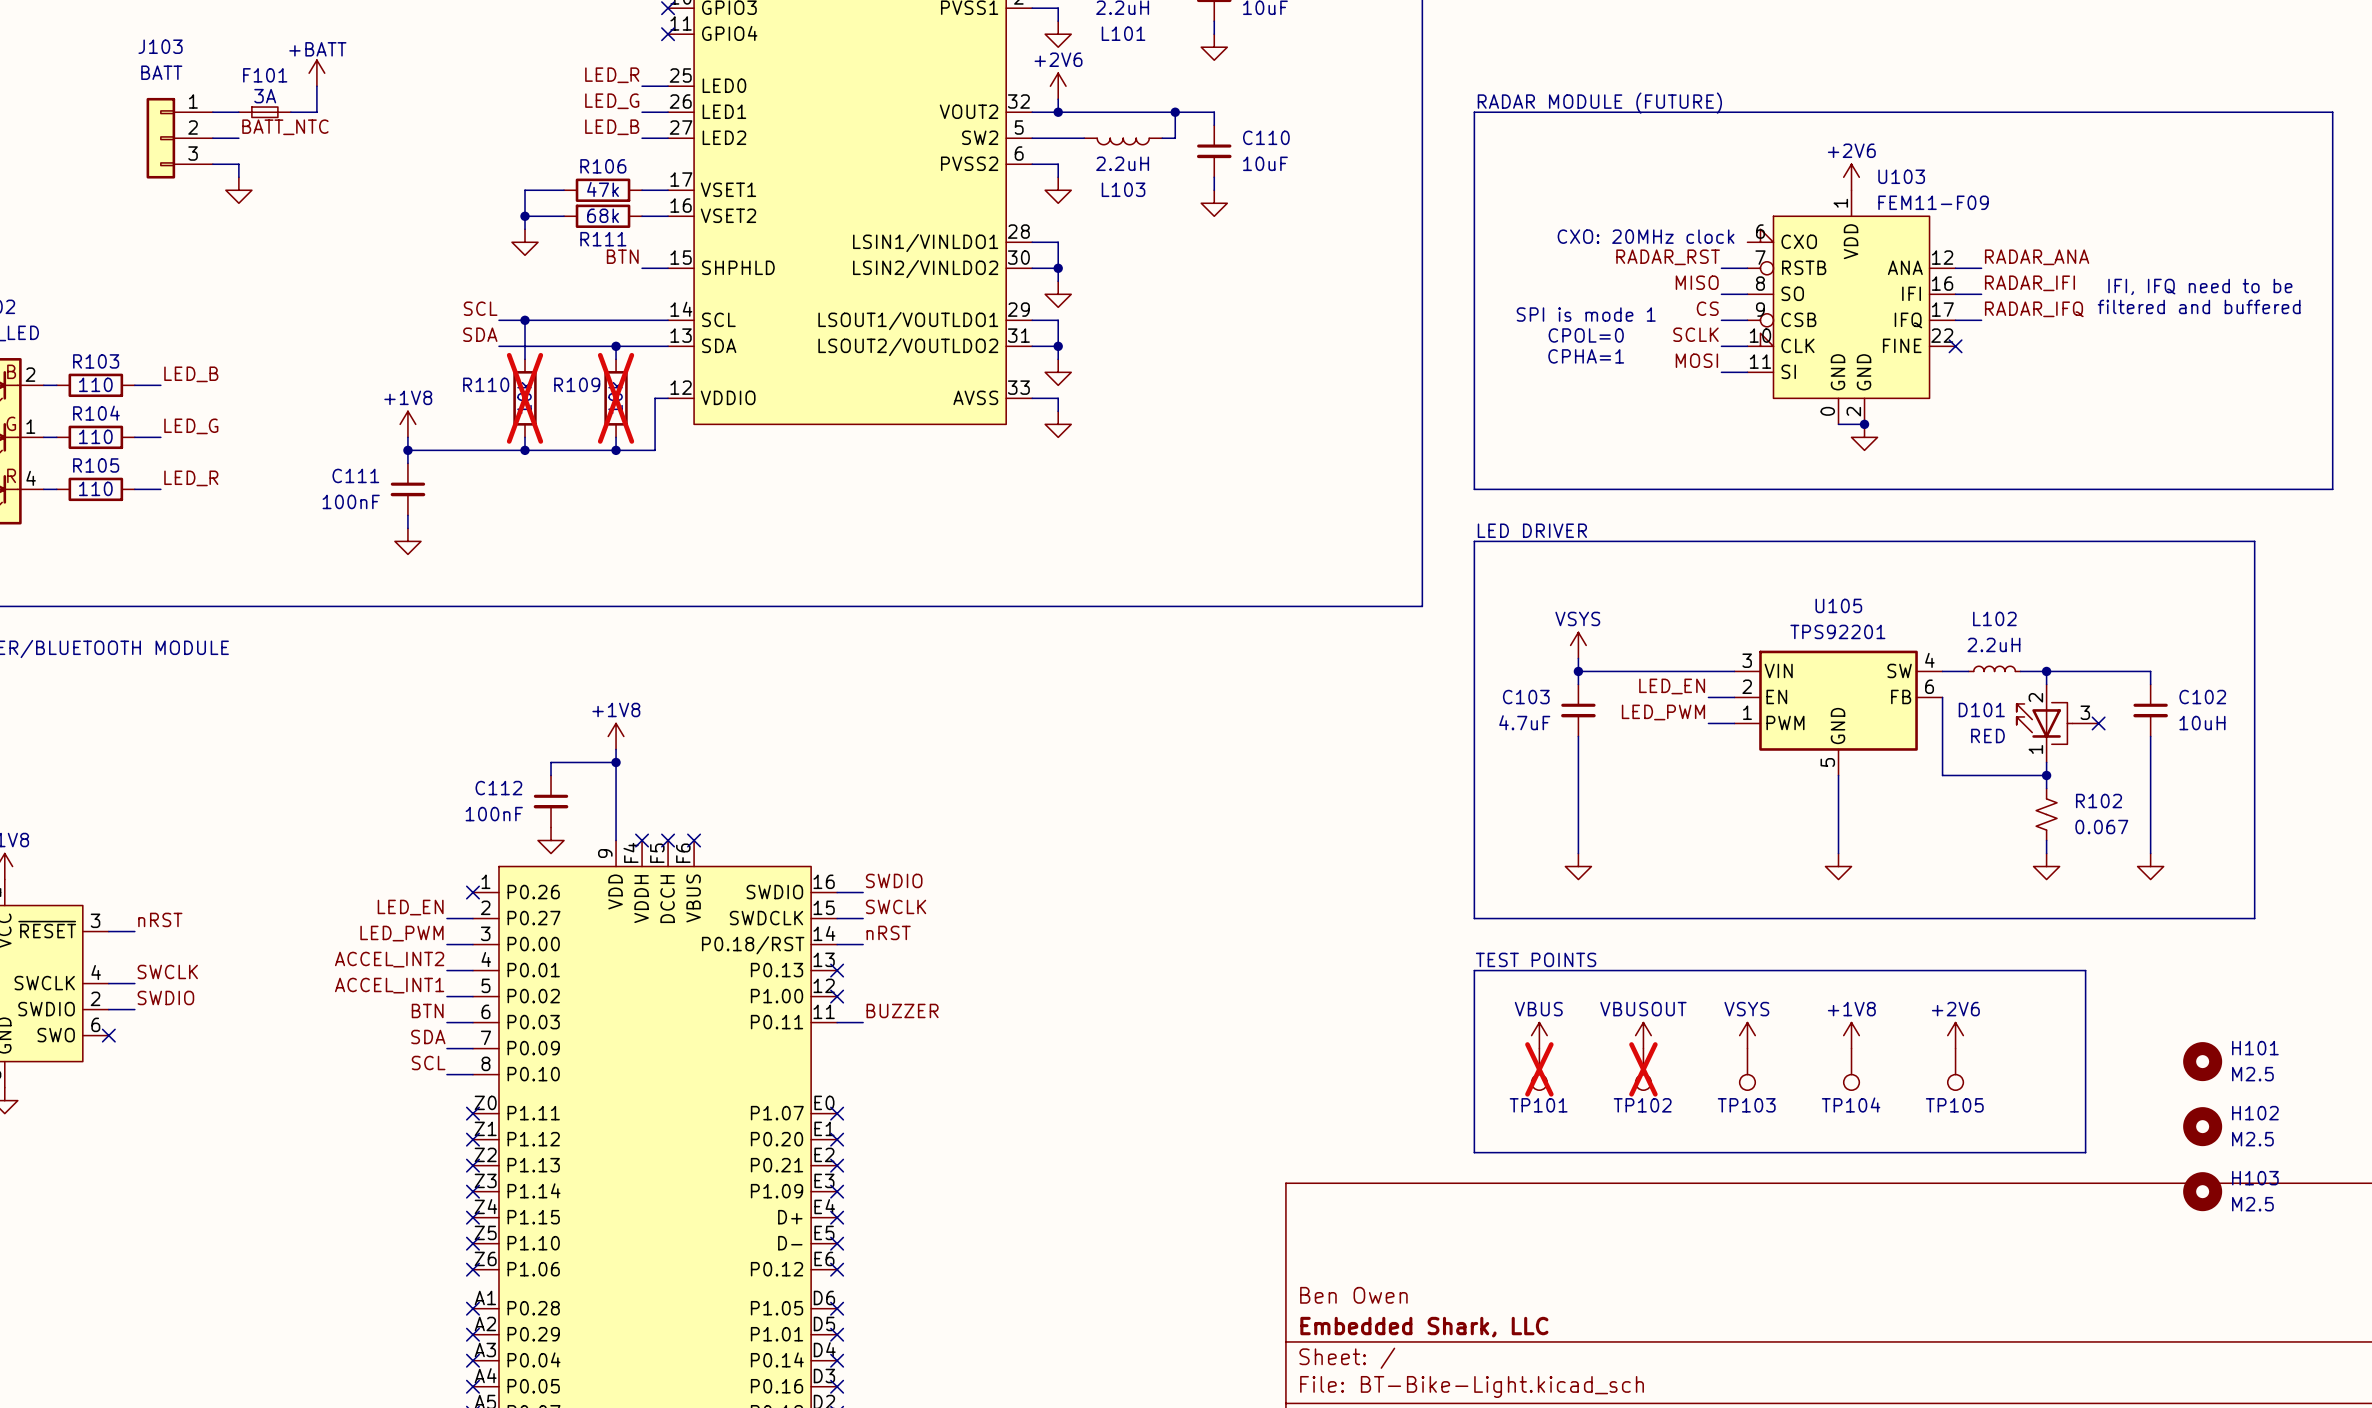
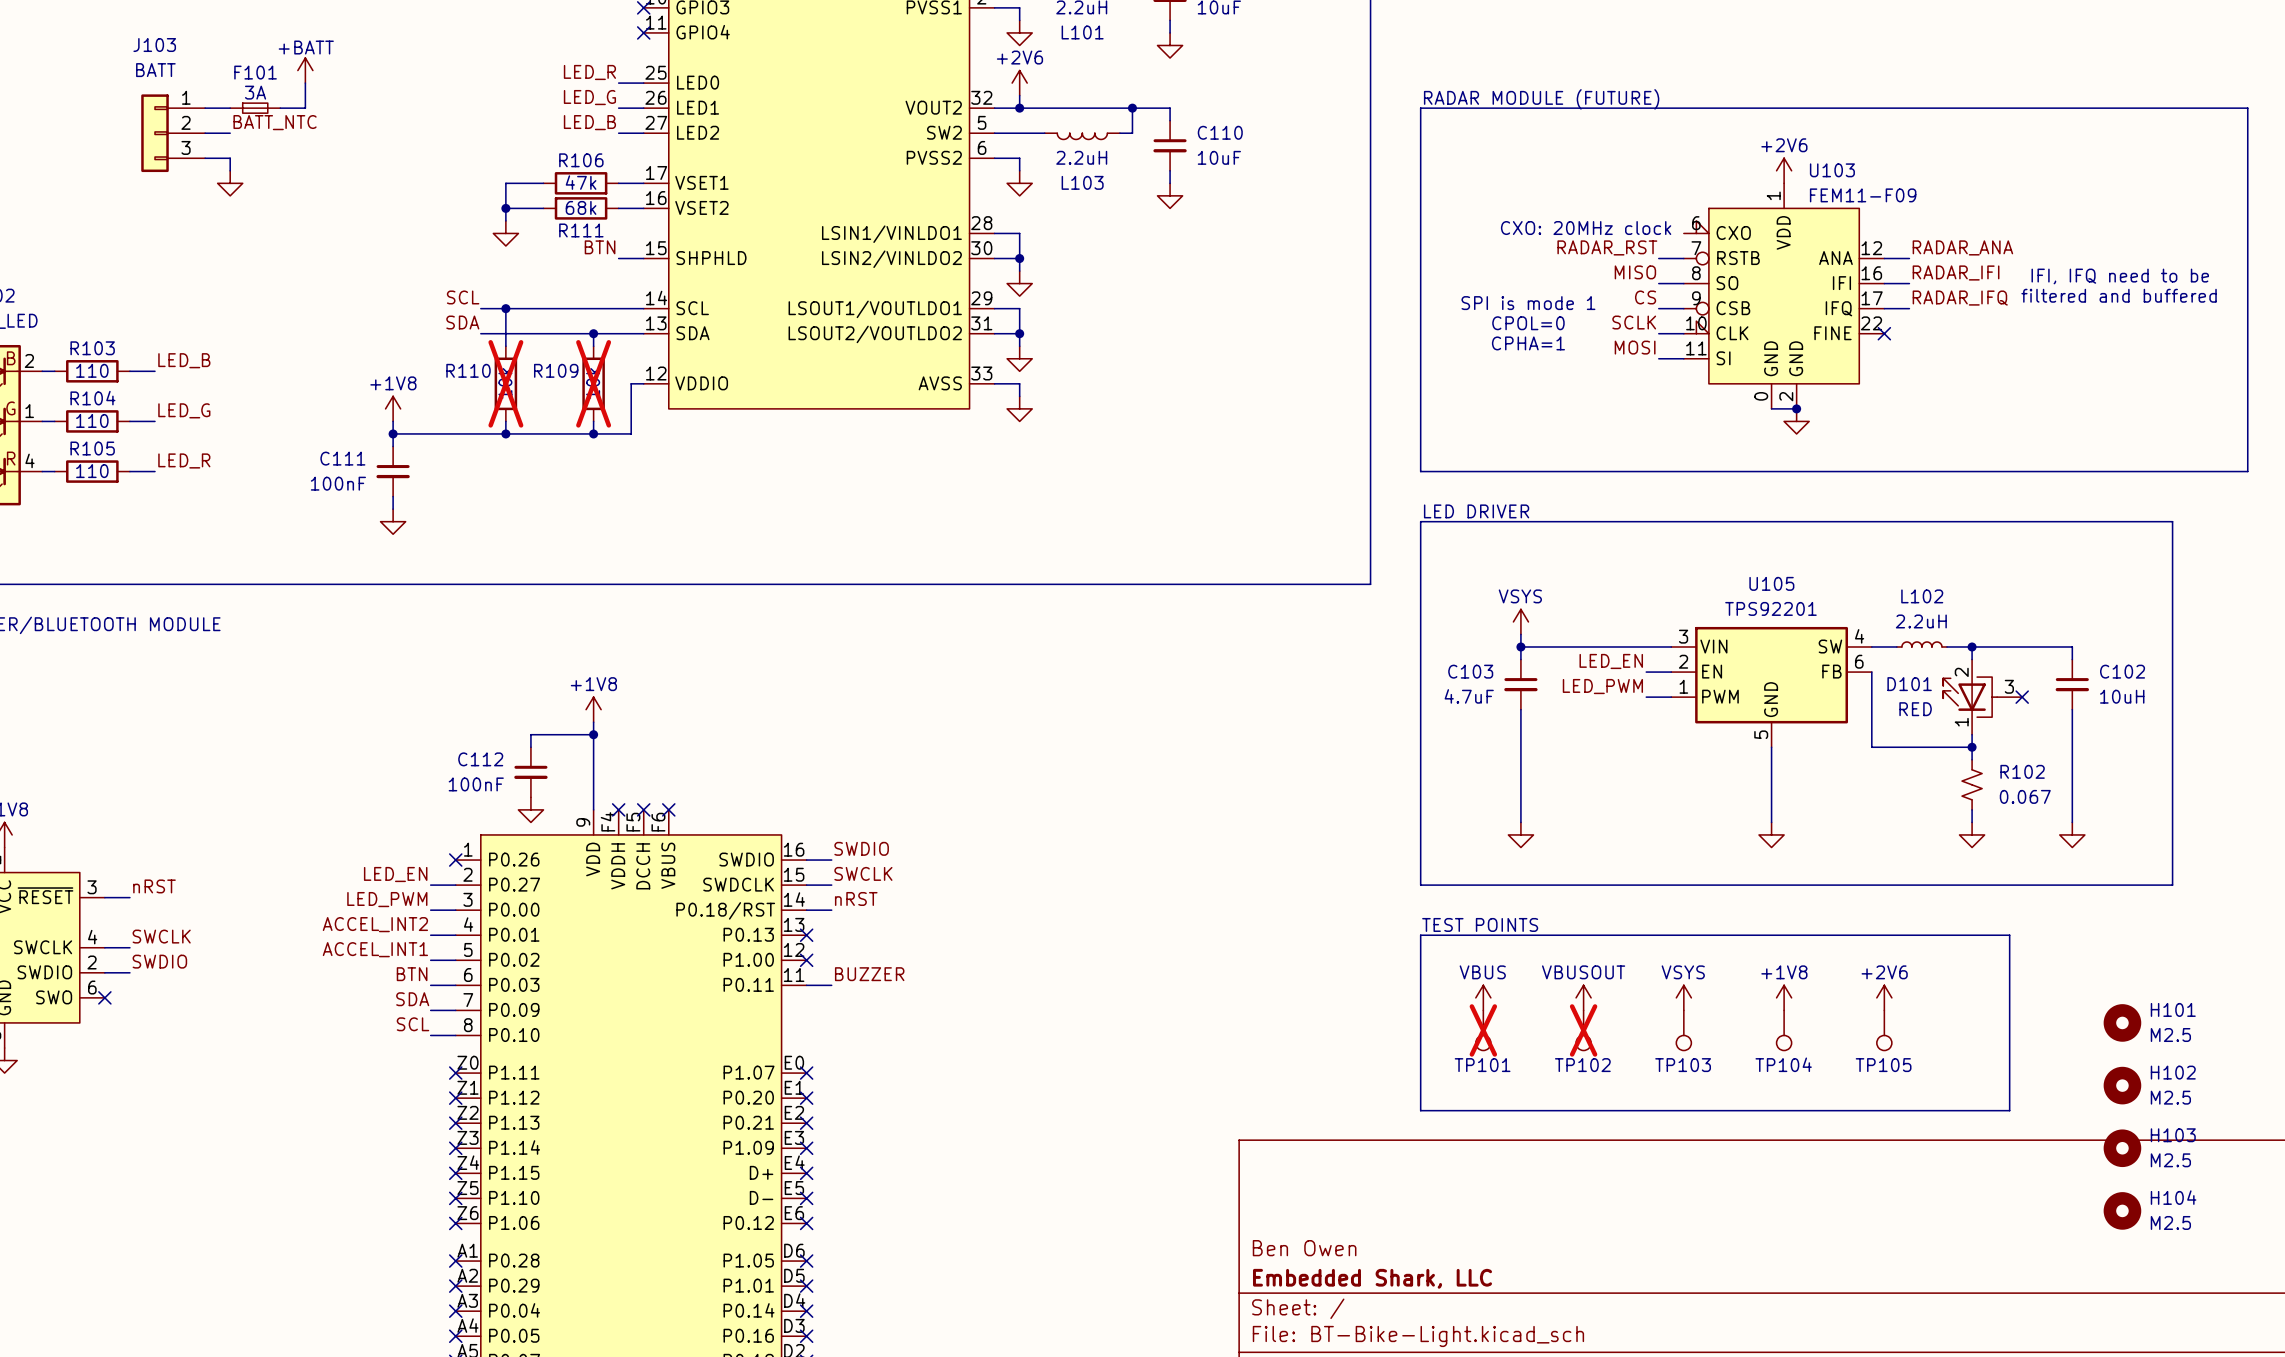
H104: none -> M2.5 (2122, 1210)

